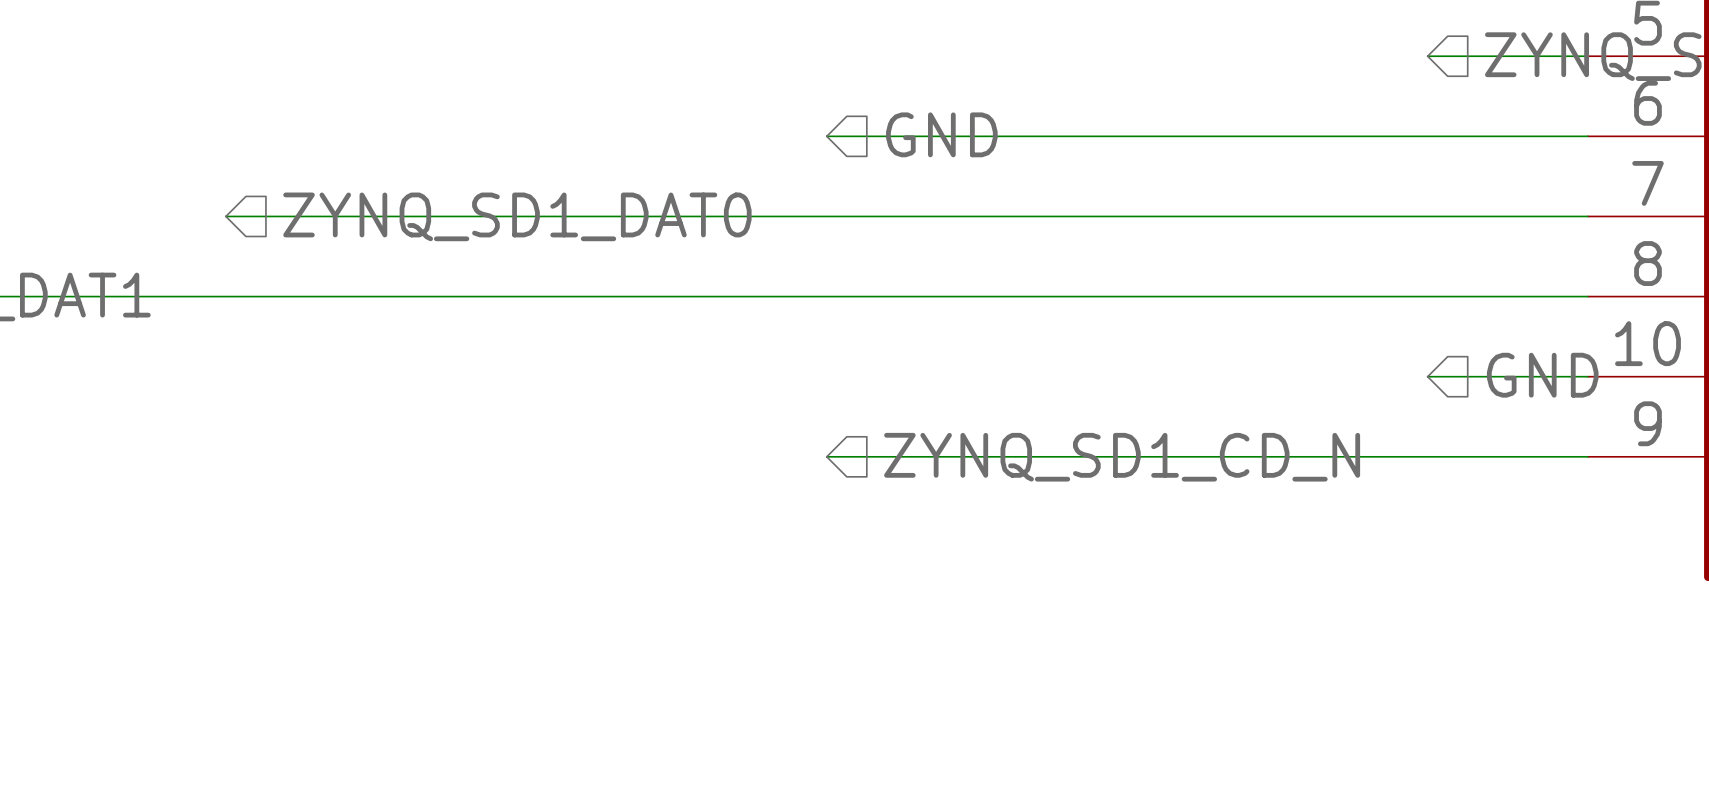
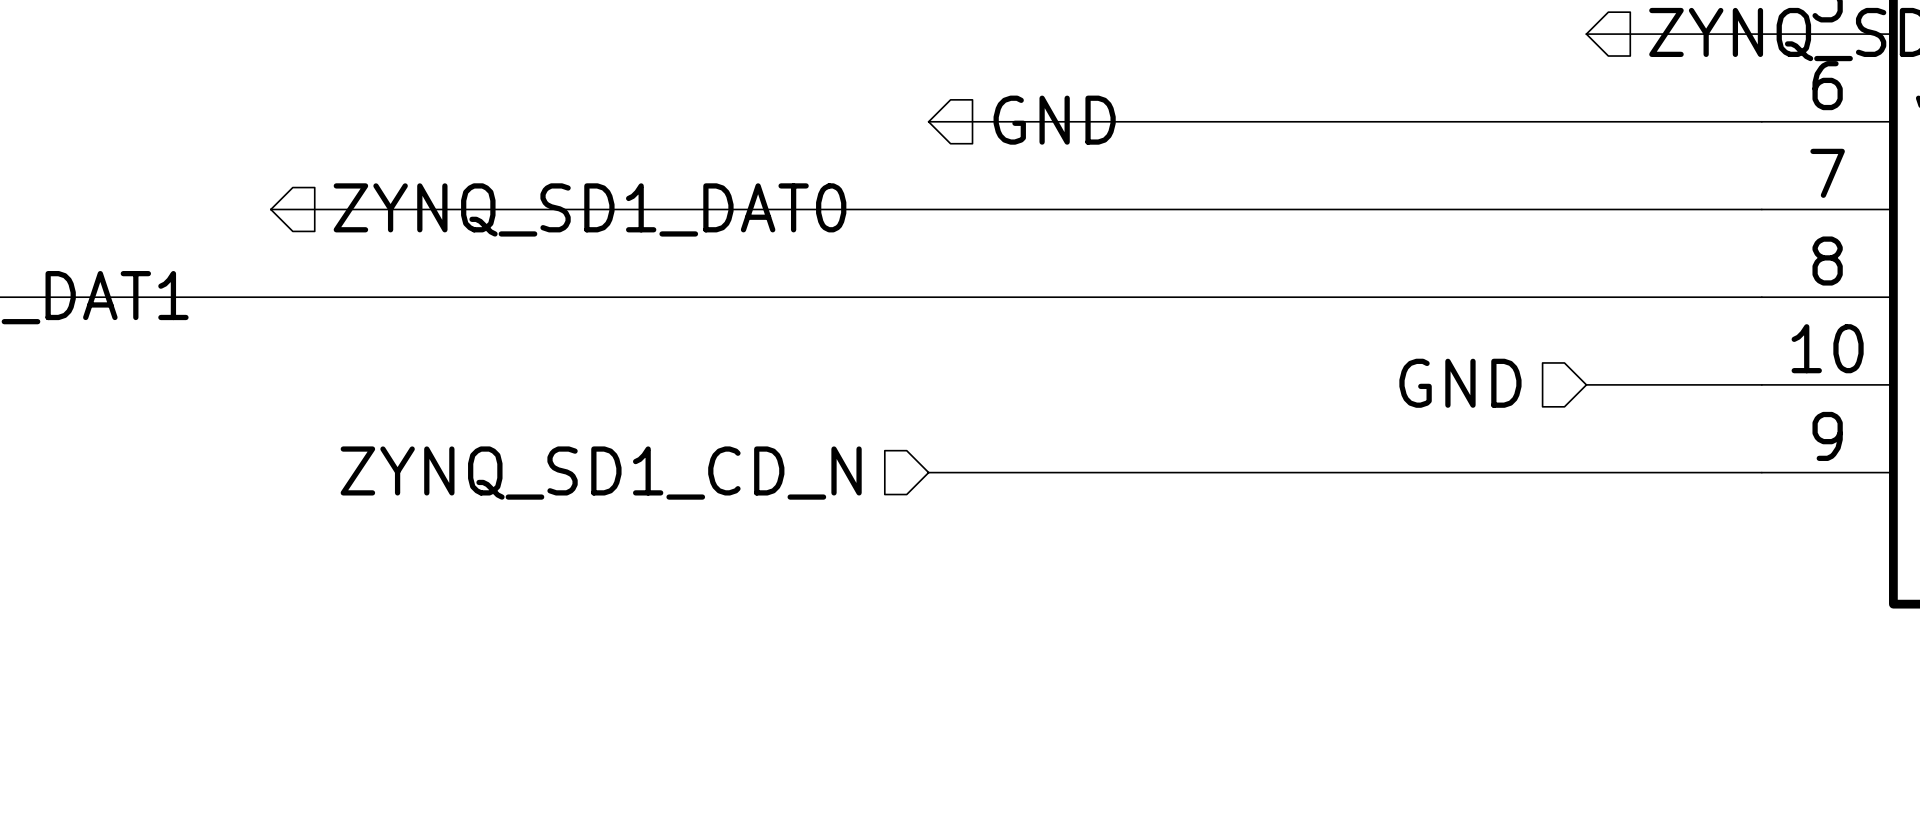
hierarchical label rotation: 0° (1542, 375) -> 180° (1460, 383)
hierarchical label position: GND (1542, 375) -> GND (1460, 383)
hierarchical label rotation: 0° (1122, 457) -> 180° (601, 473)
hierarchical label position: ZYNQ_SD1_CD_N (1122, 457) -> ZYNQ_SD1_CD_N (601, 473)

